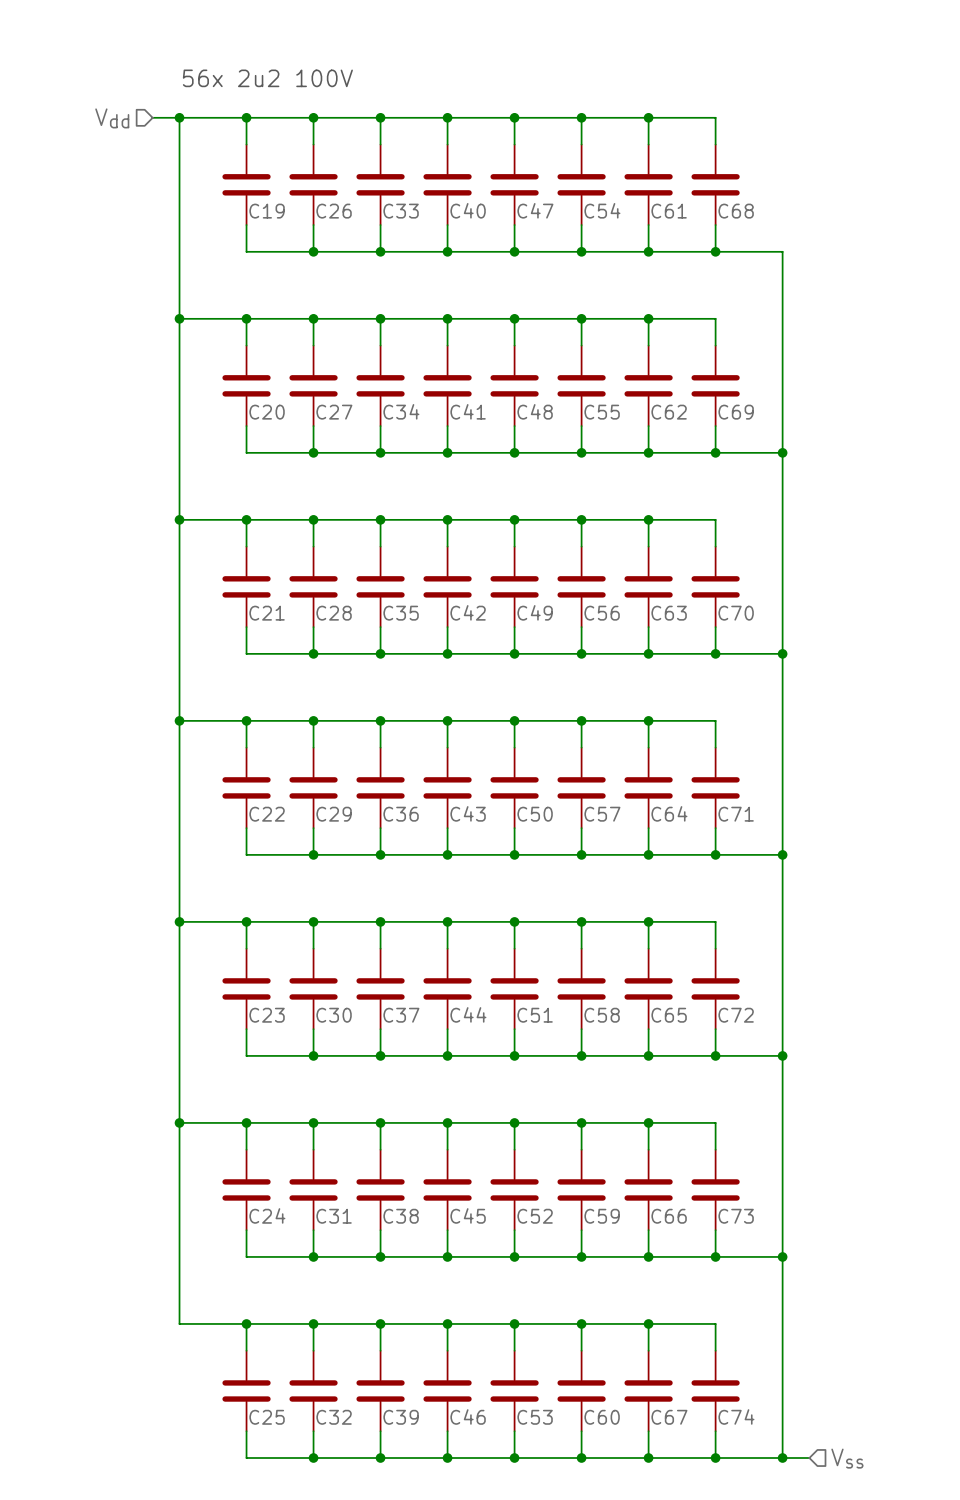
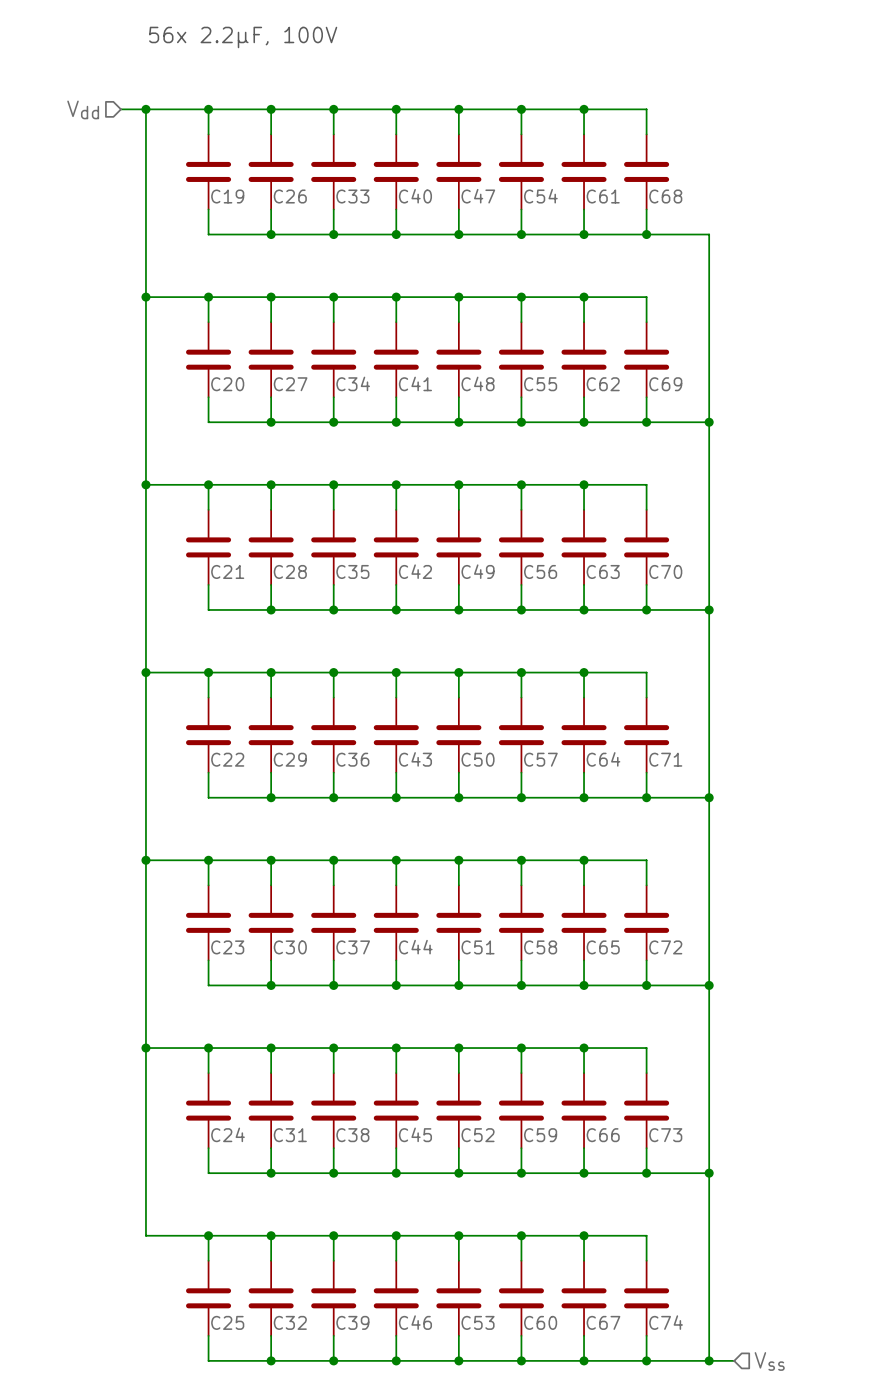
text: none -> 56x 2.2µF, 100V (243, 37)
text: 56x 2u2 100V (267, 78) -> none

